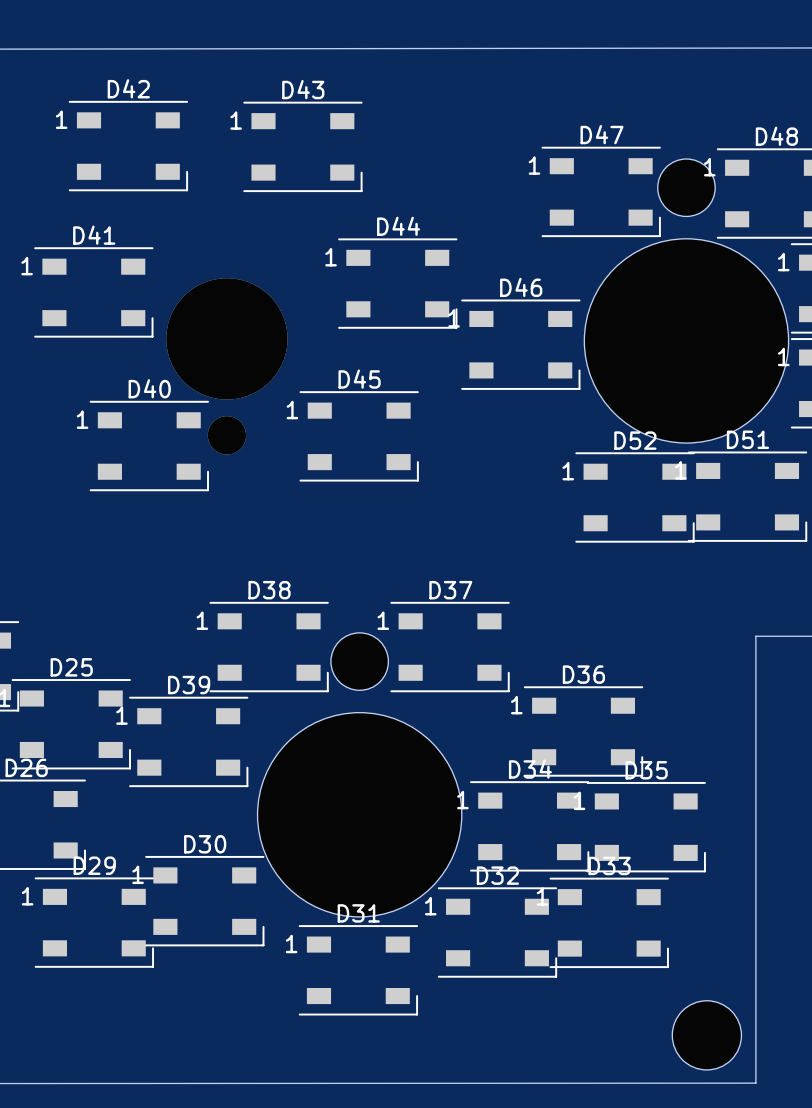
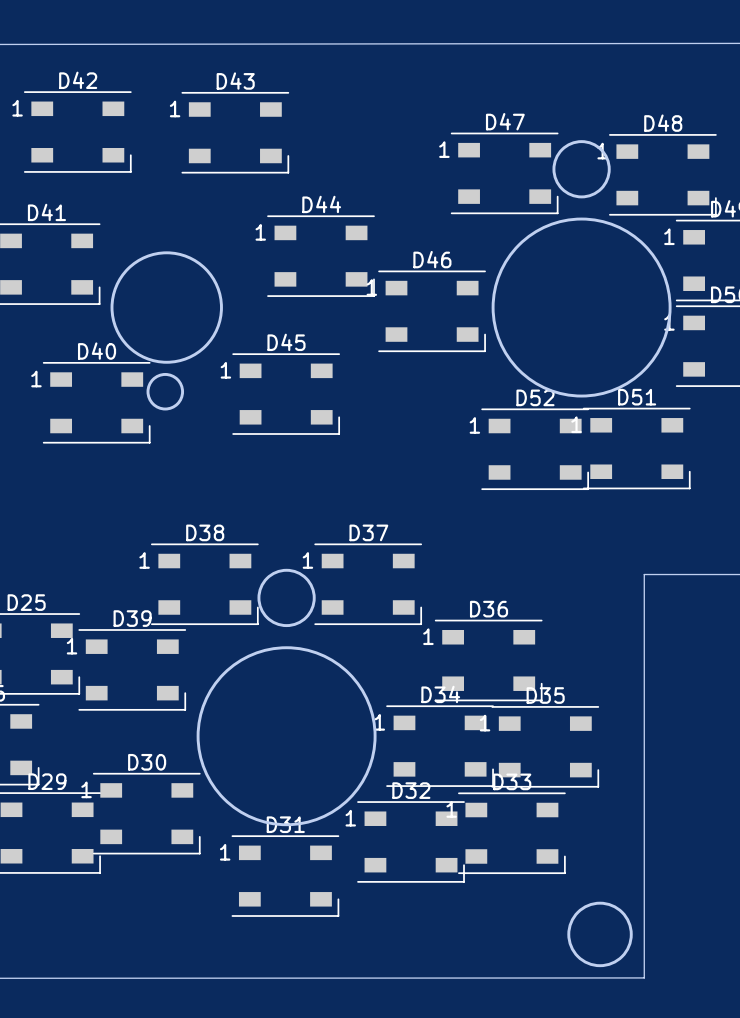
round board edge: none -> [552, 140, 611, 199]
round board edge: none -> [491, 217, 672, 398]
round board edge: none -> [110, 251, 223, 364]
part: (686, 301) -> none
part: (226, 366) -> none
round board edge: none -> [146, 372, 185, 411]
round board edge: none -> [257, 568, 316, 628]
round board edge: none -> [196, 646, 377, 827]
part: (359, 774) -> none
round board edge: none -> [567, 901, 633, 968]
part: (706, 1035) -> none

